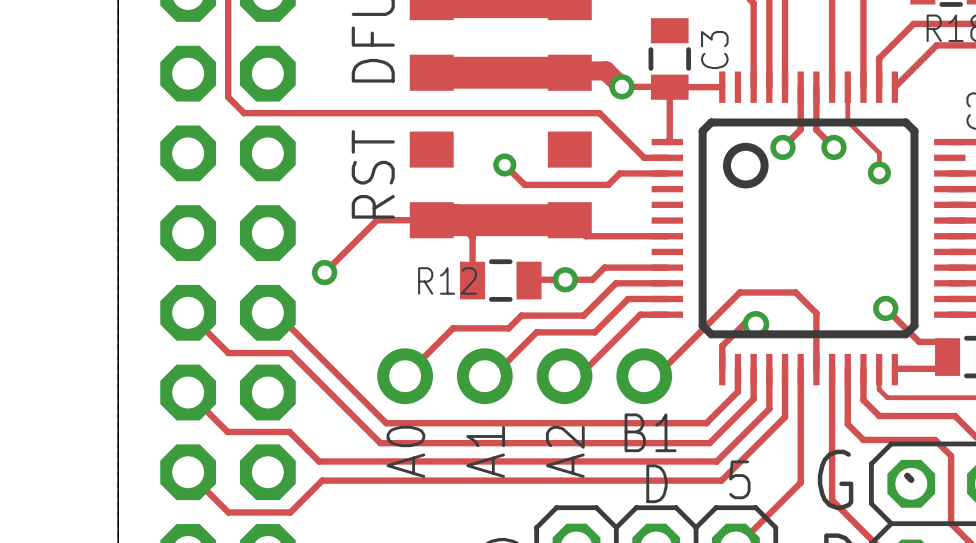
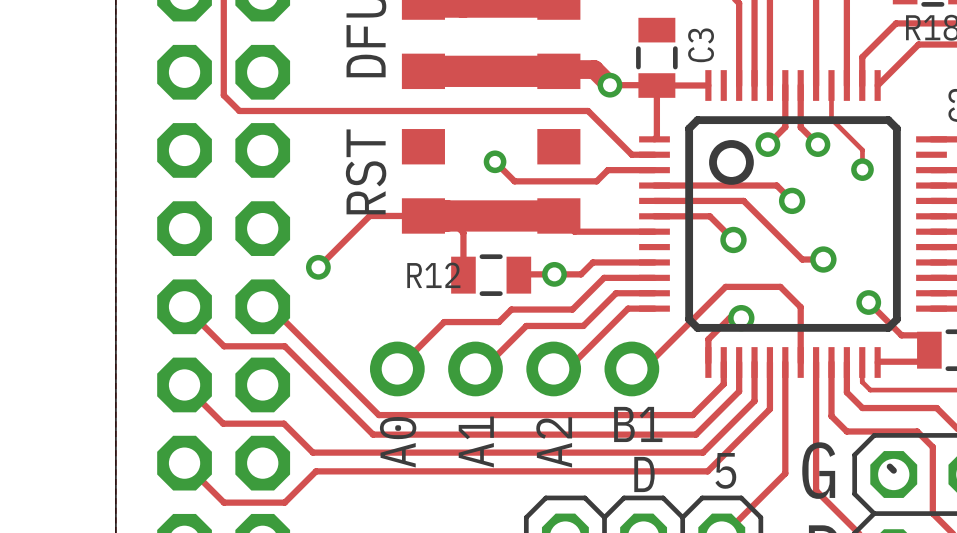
track: none -> (654, 185) (776, 185) (792, 200)
track: none -> (654, 200) (743, 200) (802, 259) (823, 259)
via: none -> (792, 200)
track: none -> (654, 216) (709, 216) (733, 239)
via: none -> (733, 239)
via: none -> (823, 259)

